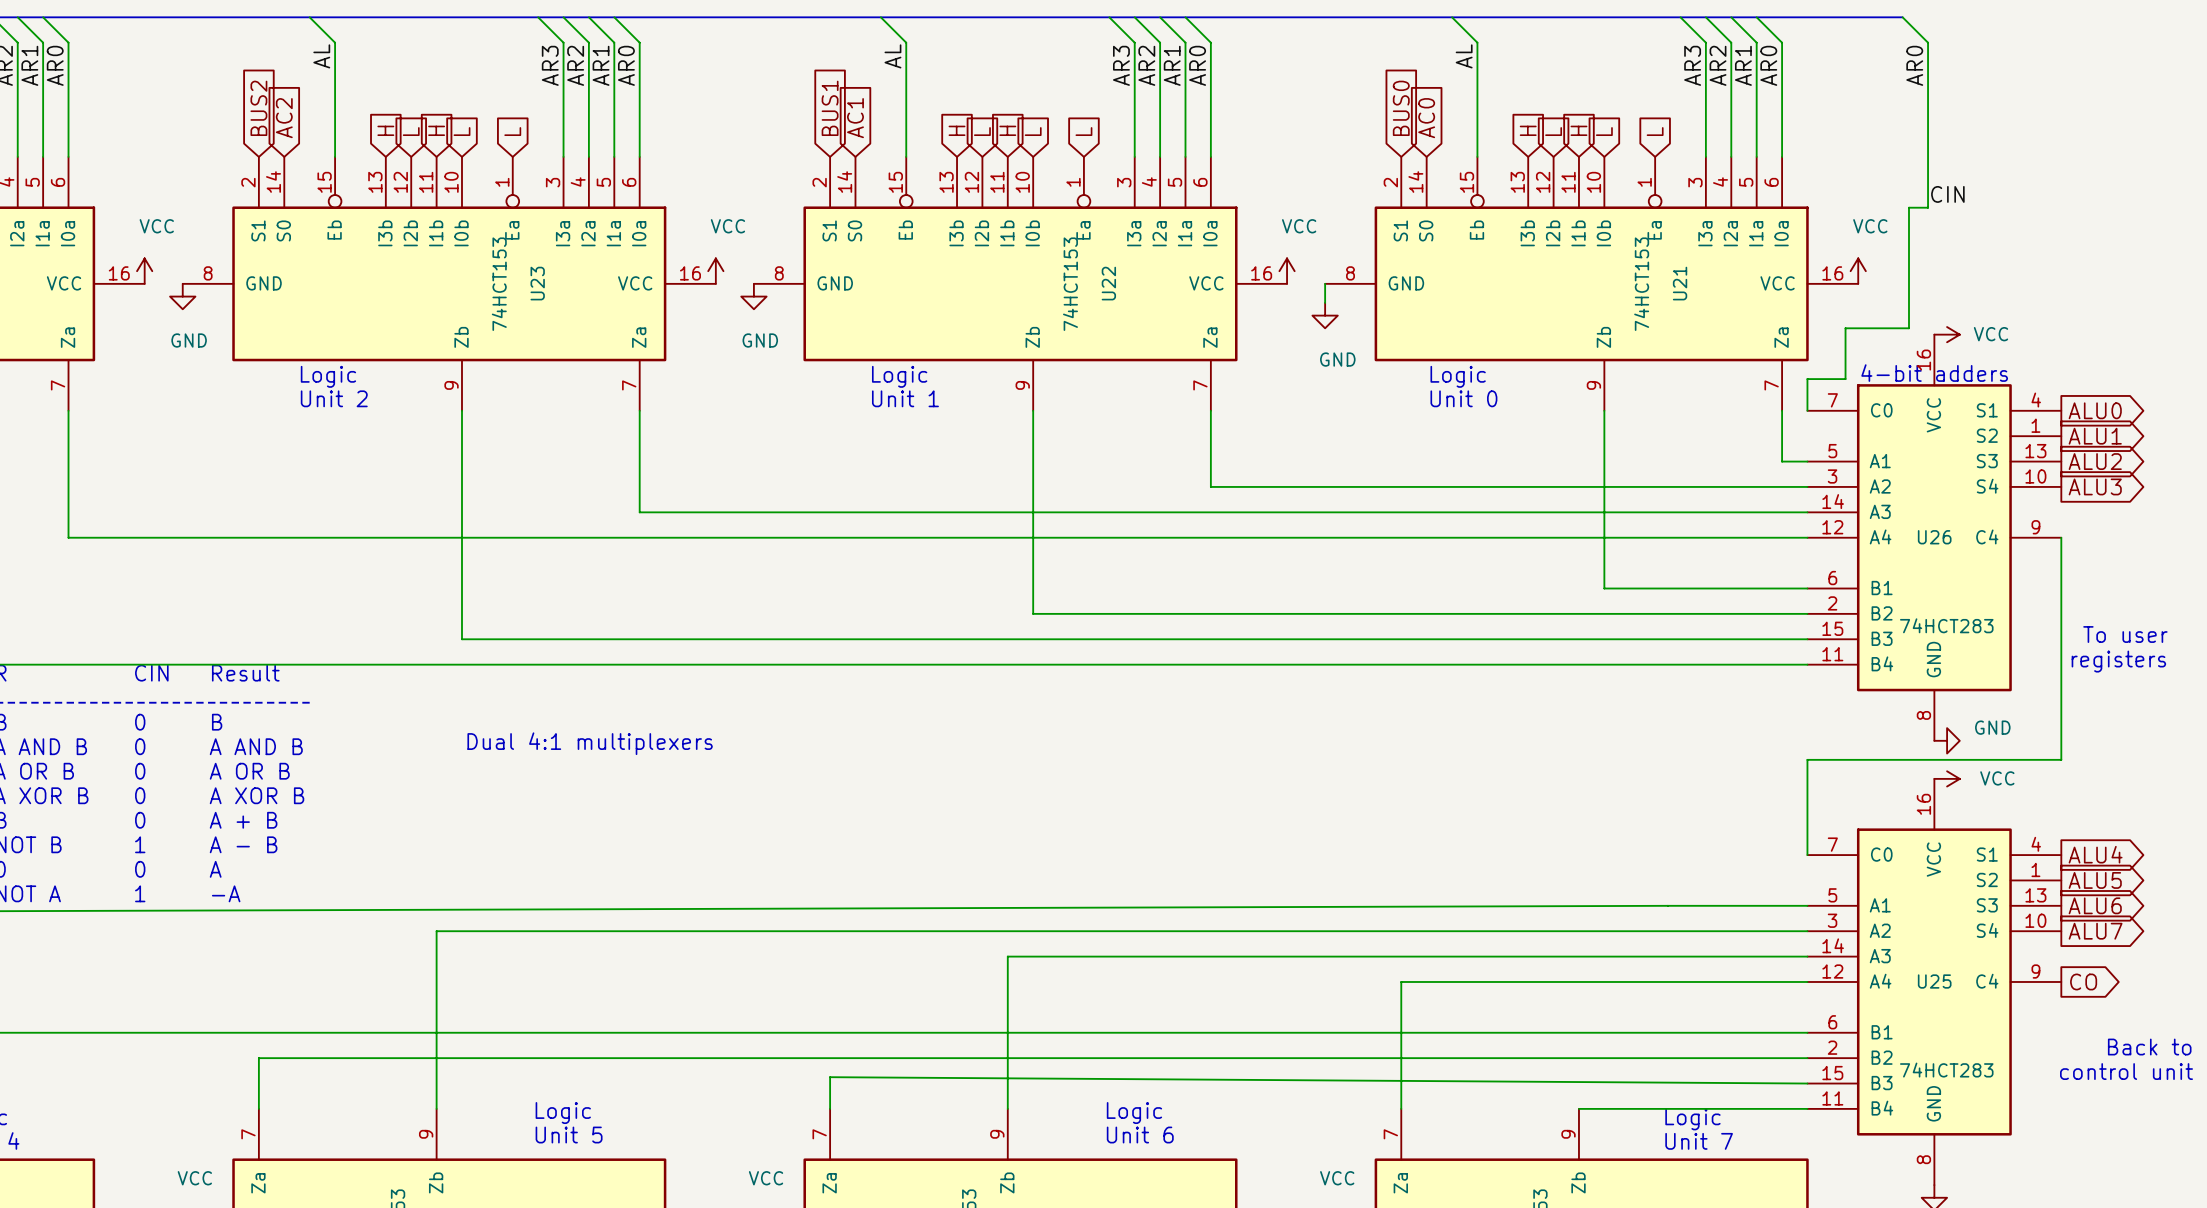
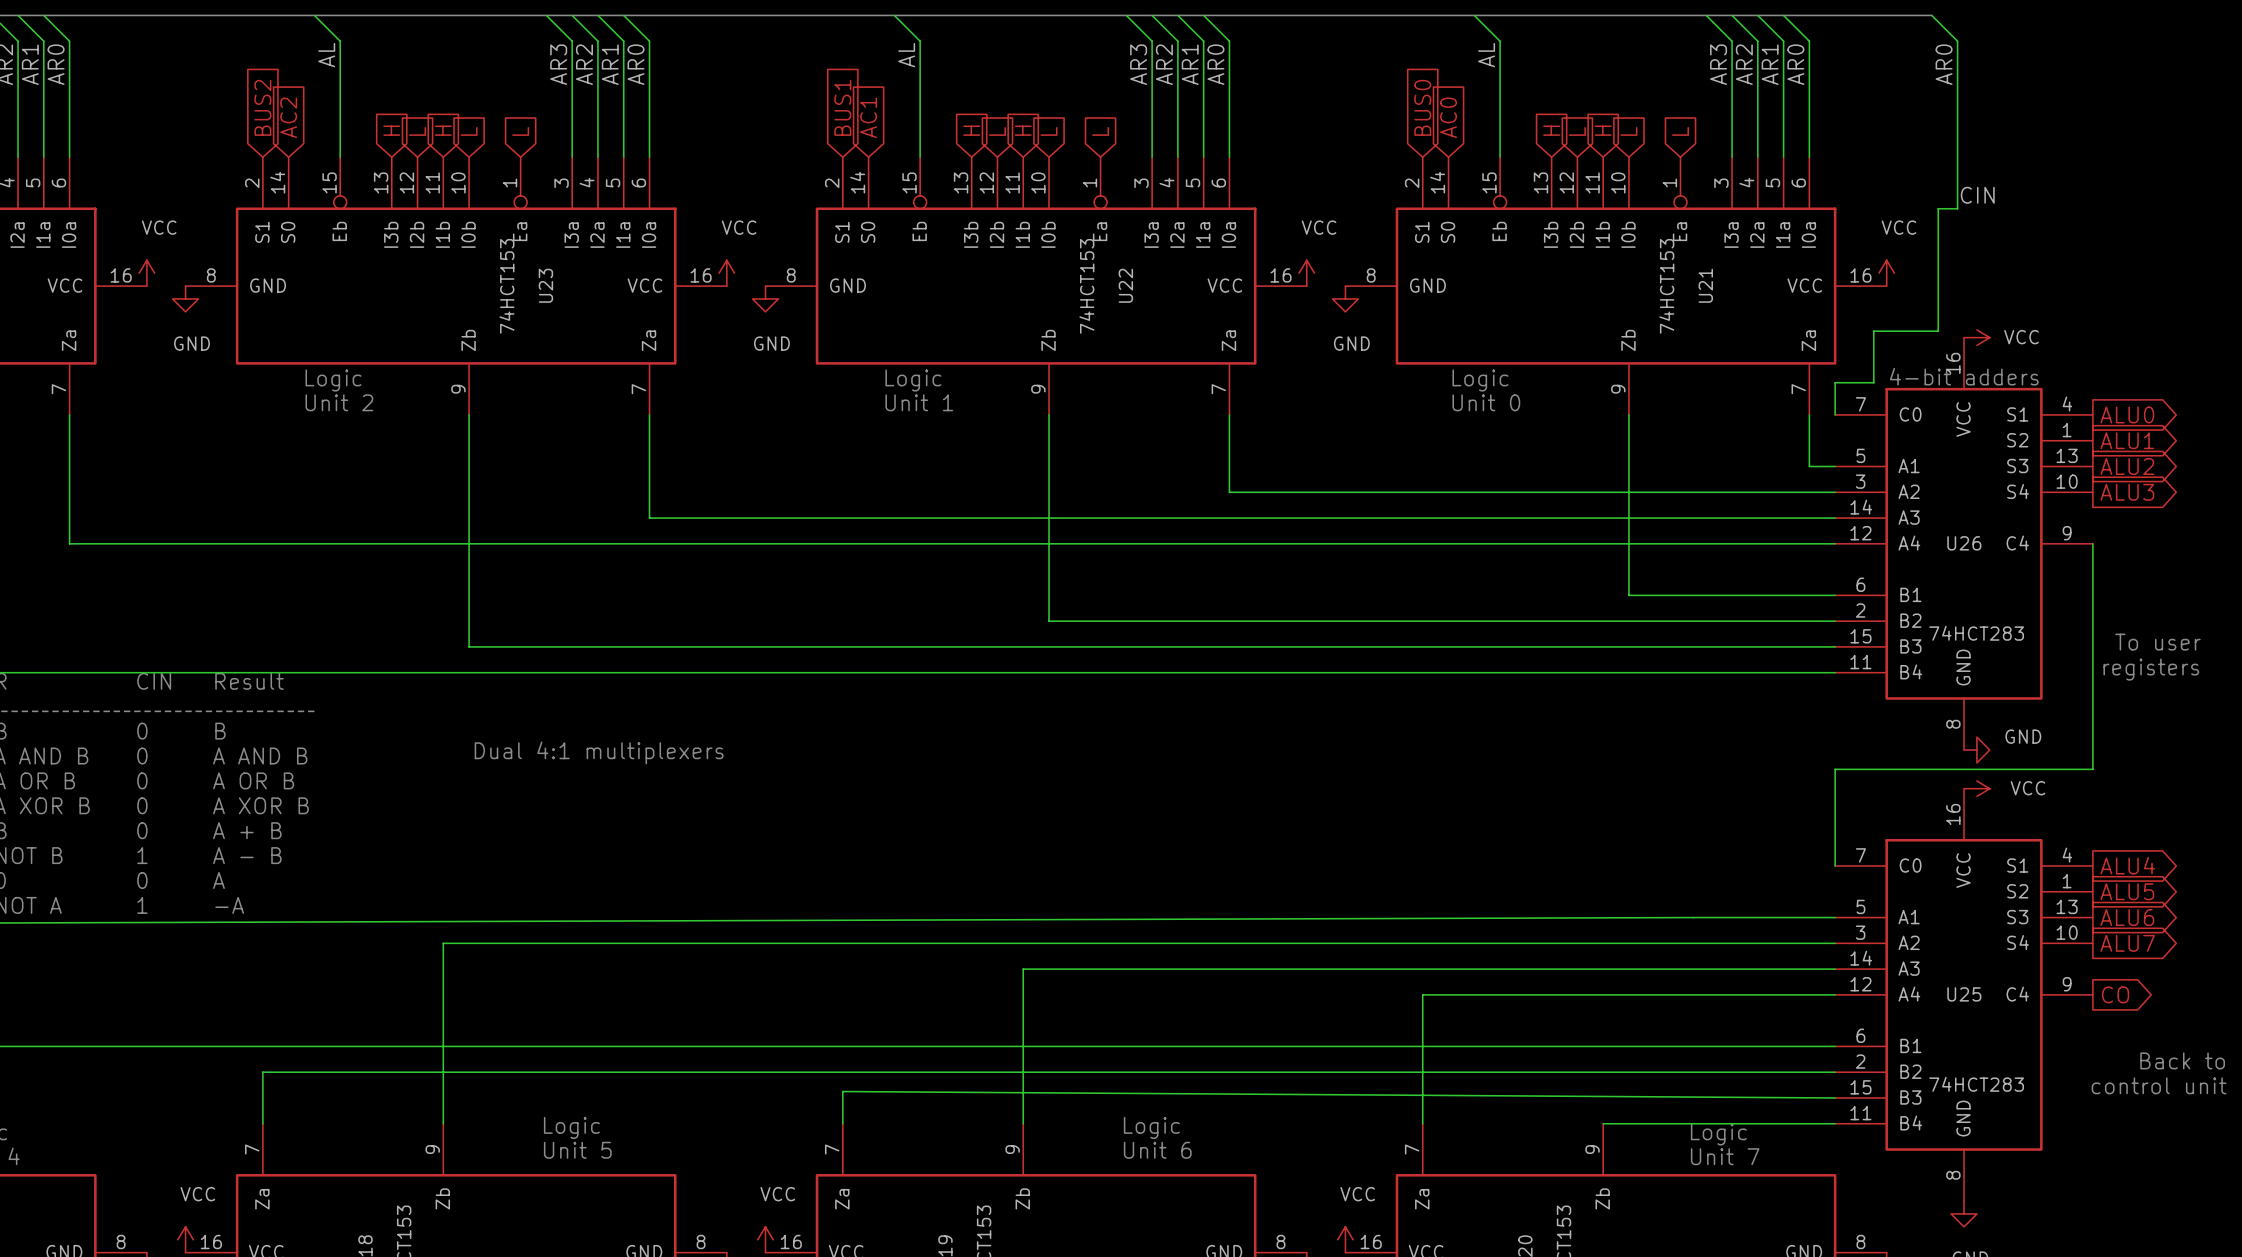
power symbol position: GND (1325, 315) -> GND (1345, 298)
power symbol text position: GND (1337, 359) -> GND (1351, 343)

